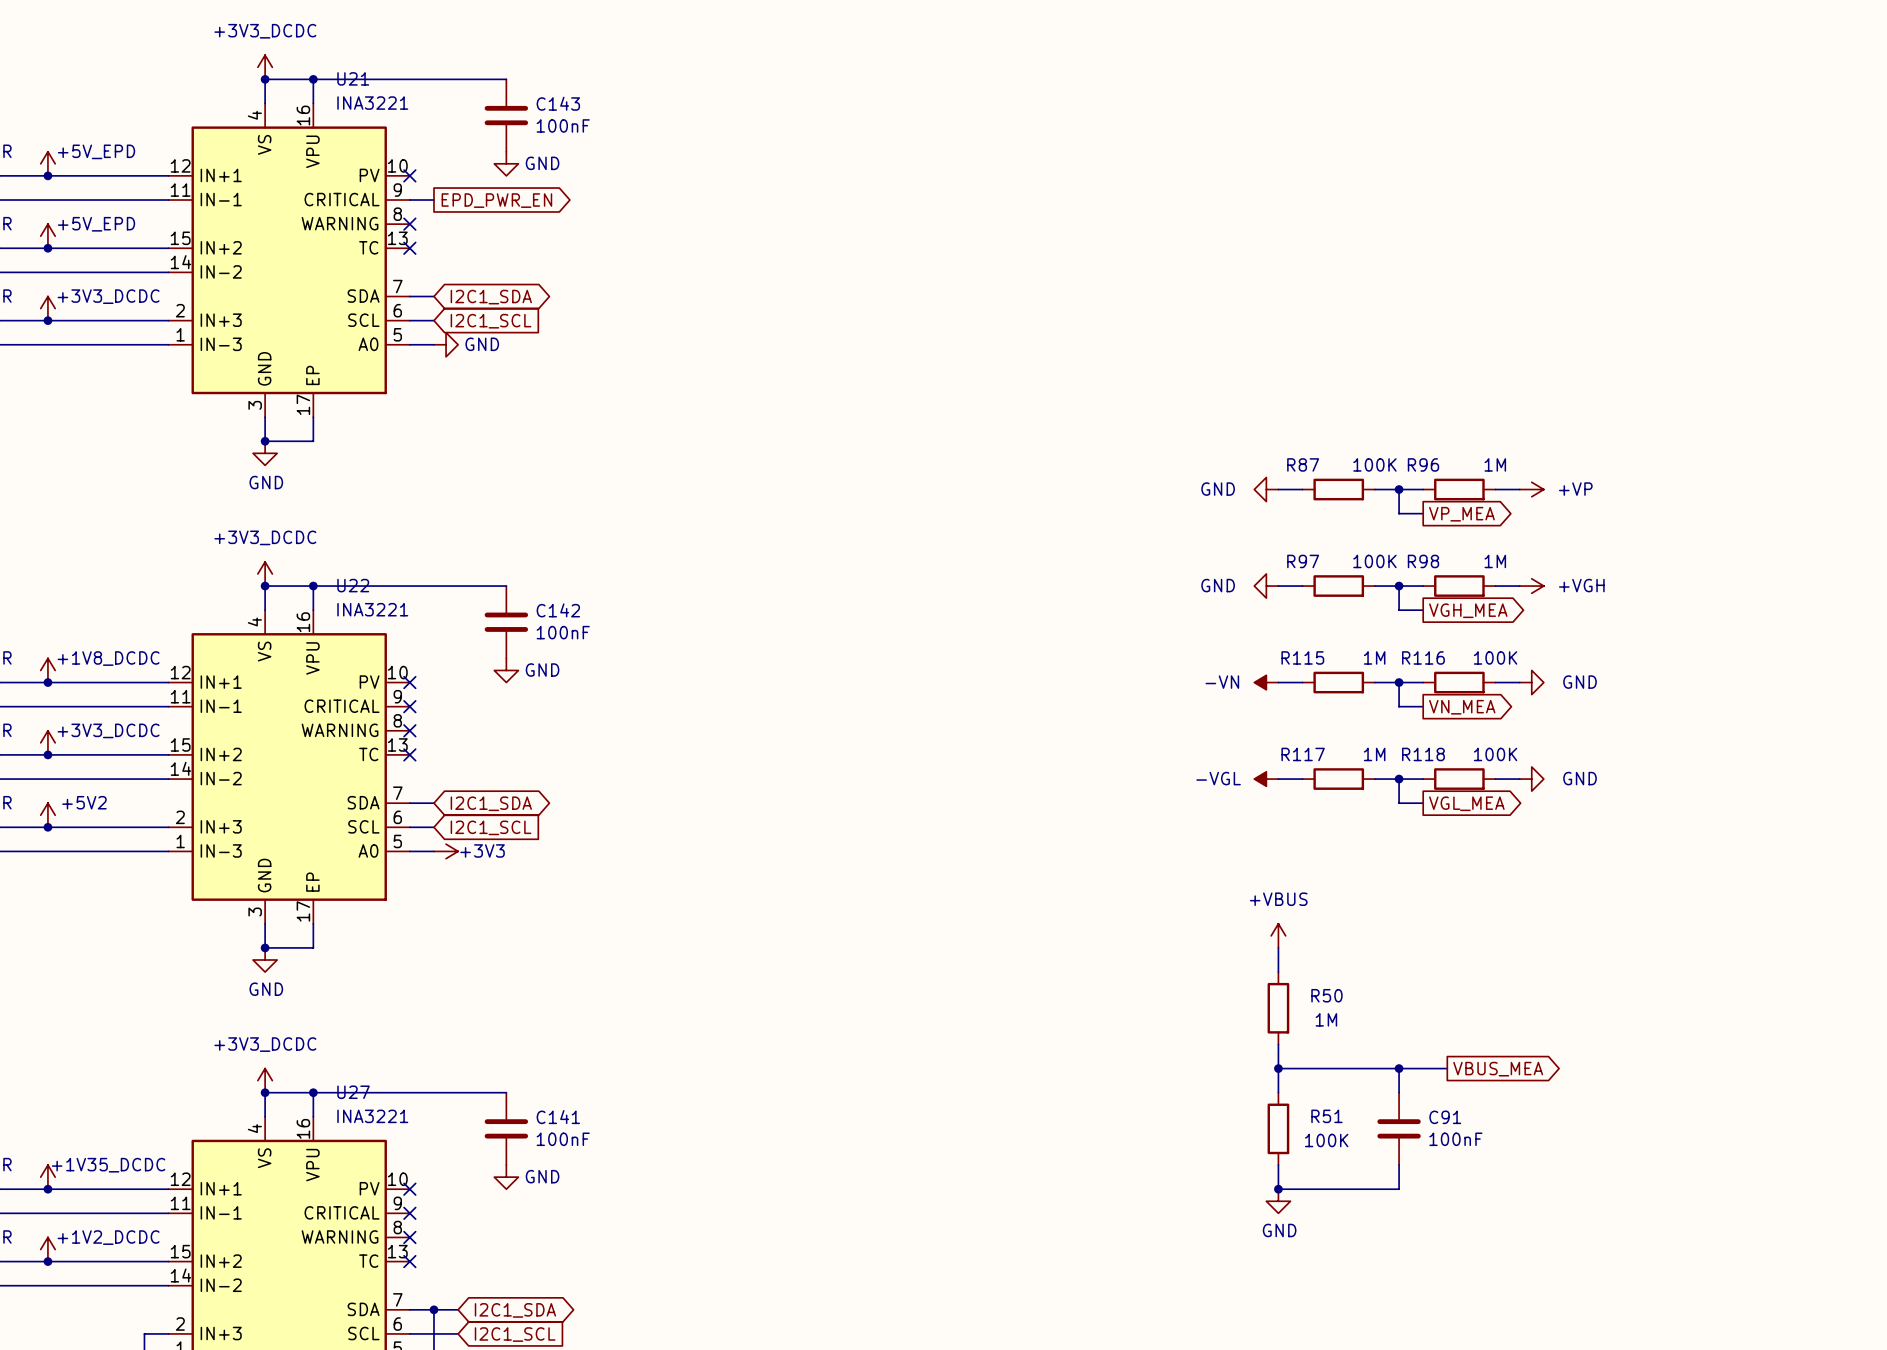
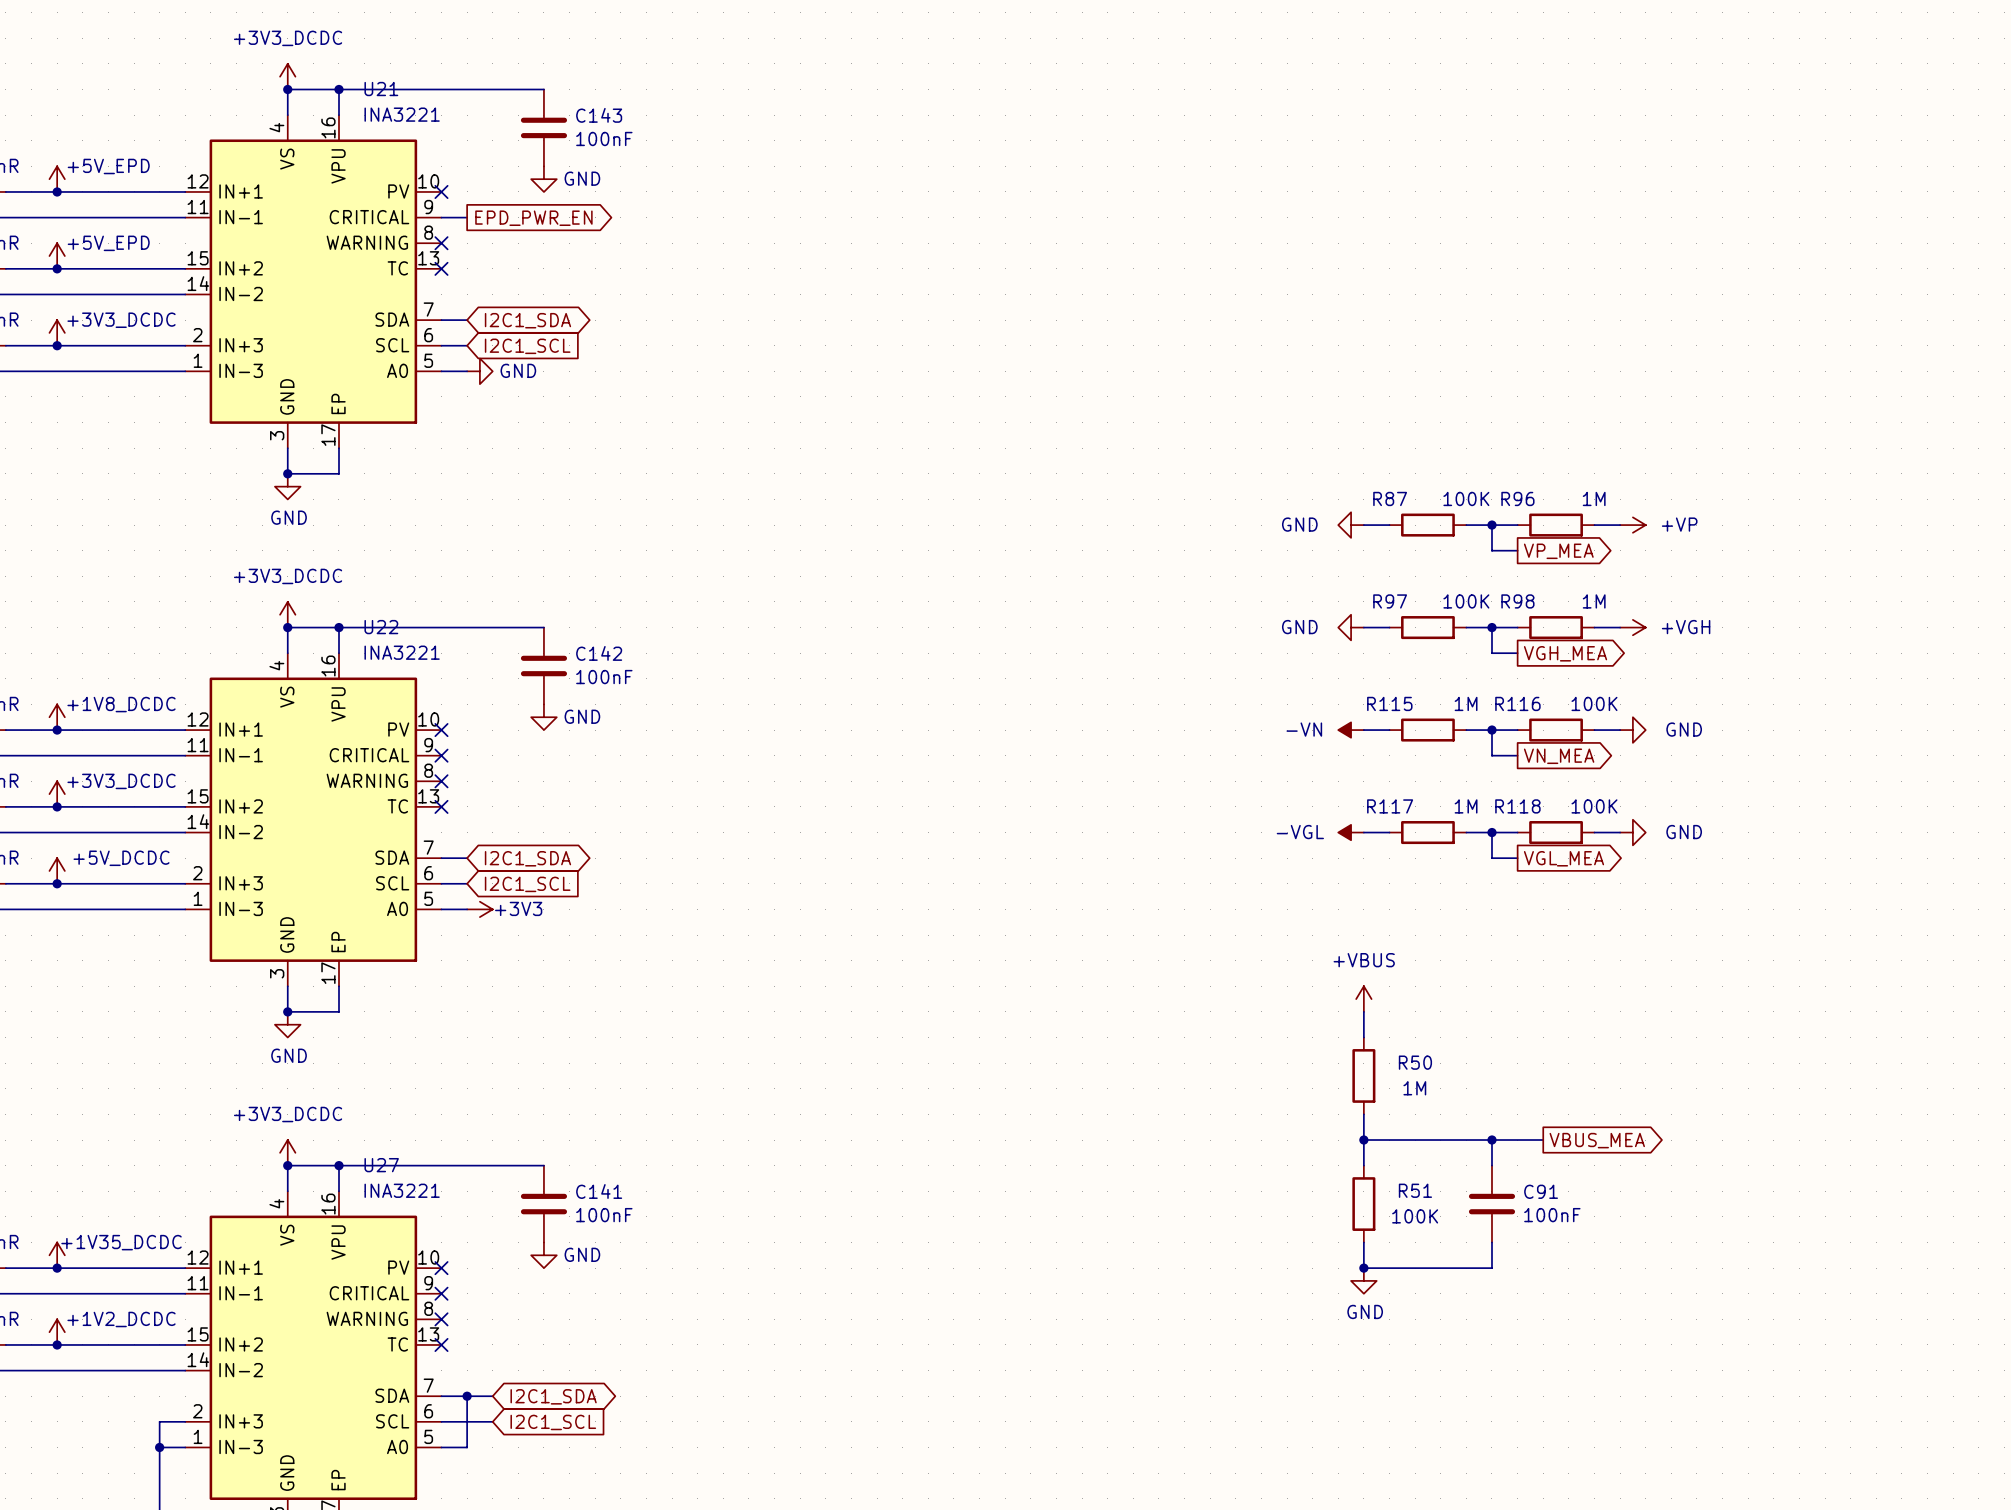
power symbol: +5V2 (47, 815) -> +5V_DCDC (57, 870)

